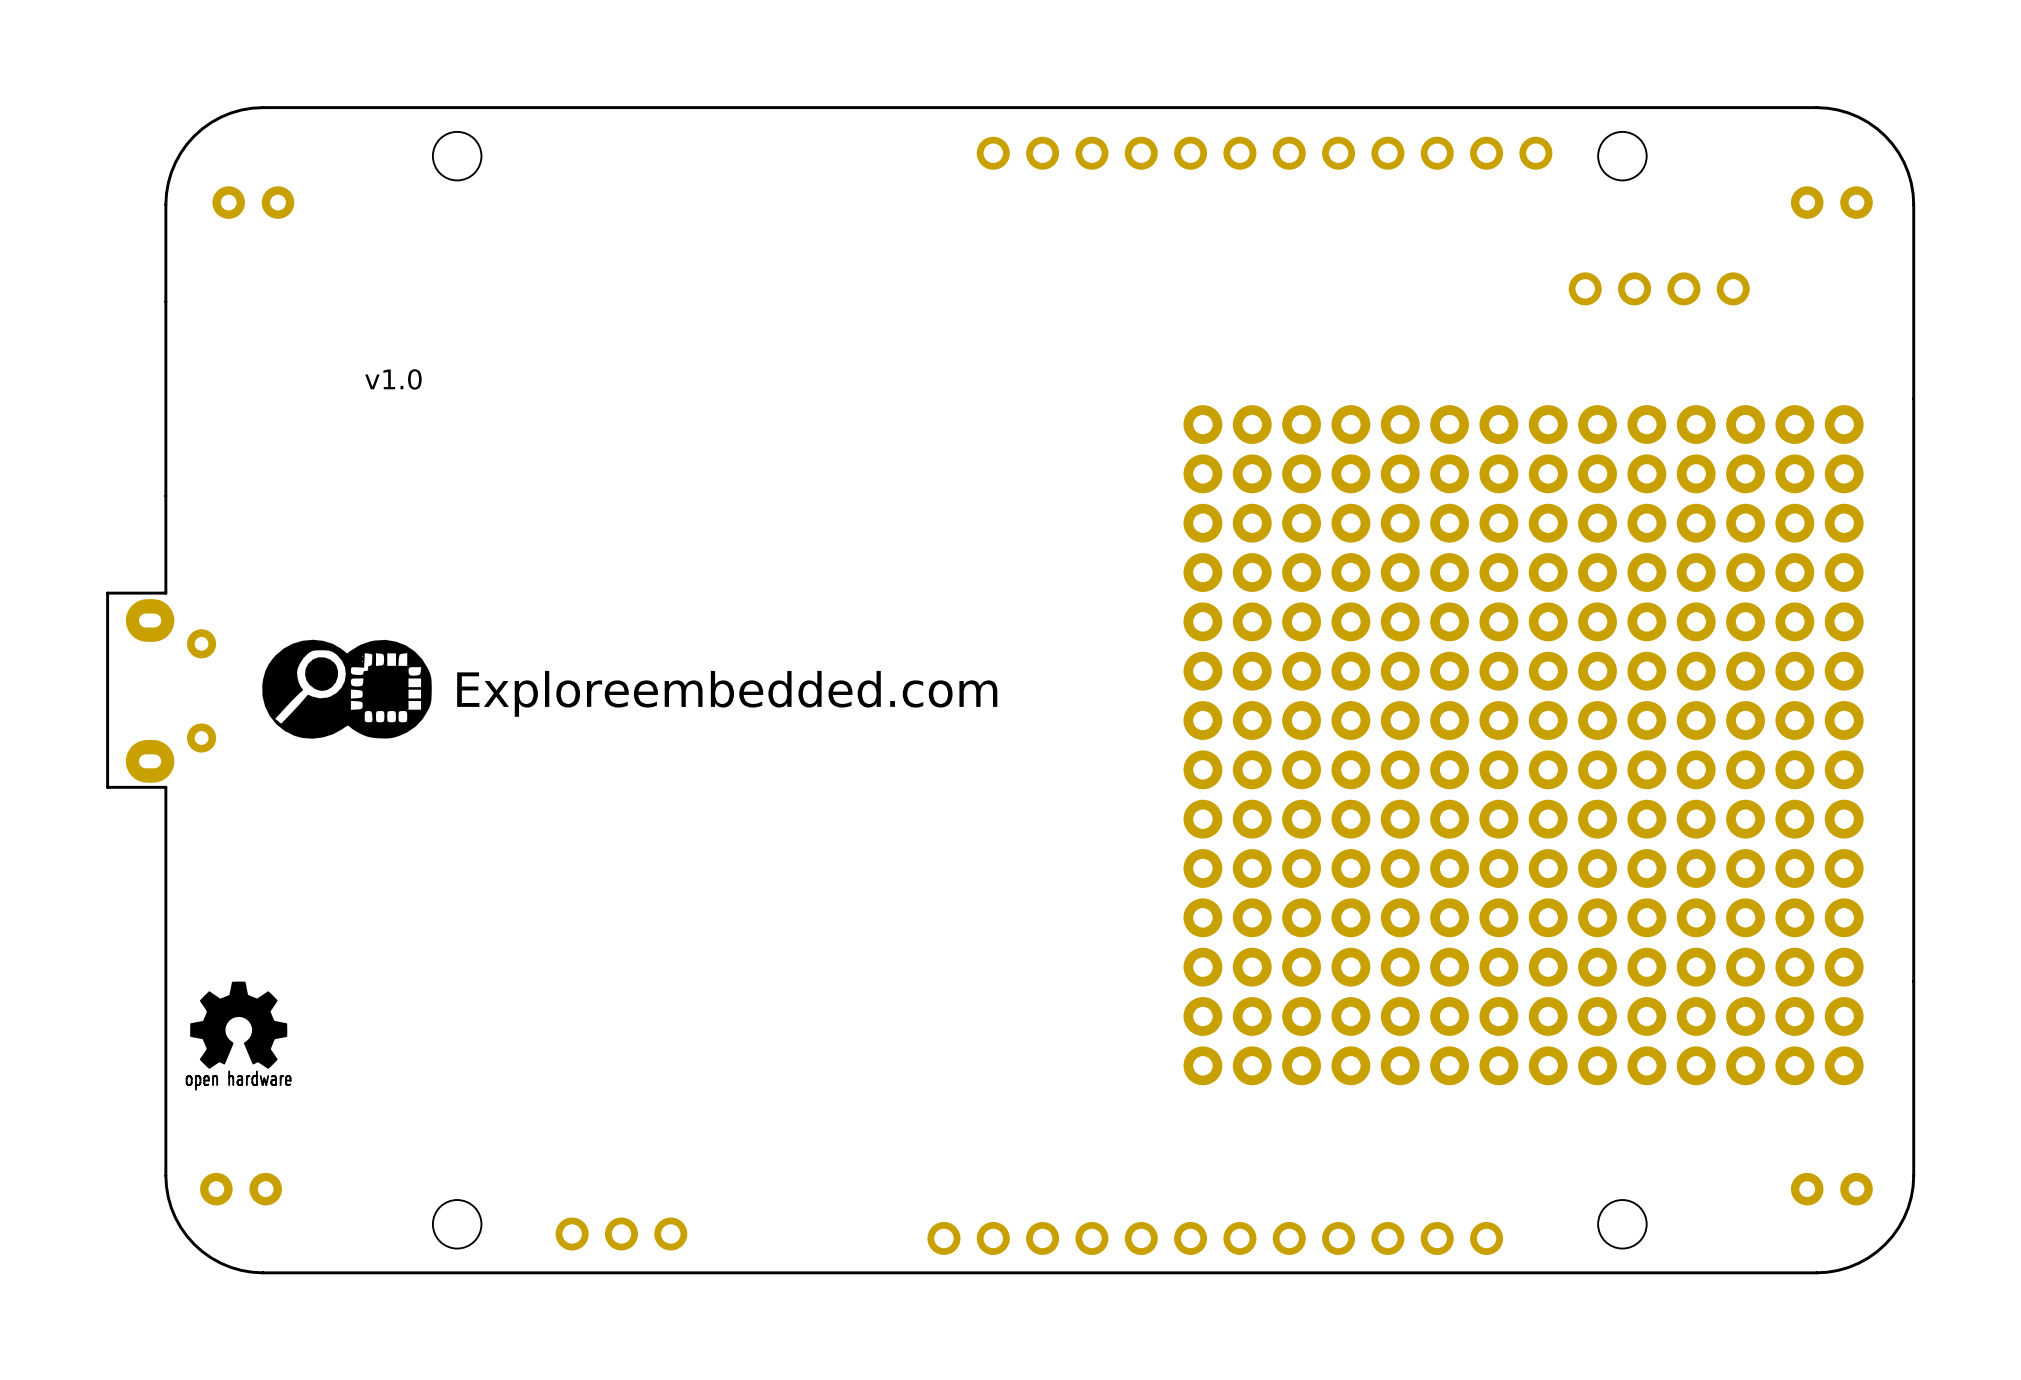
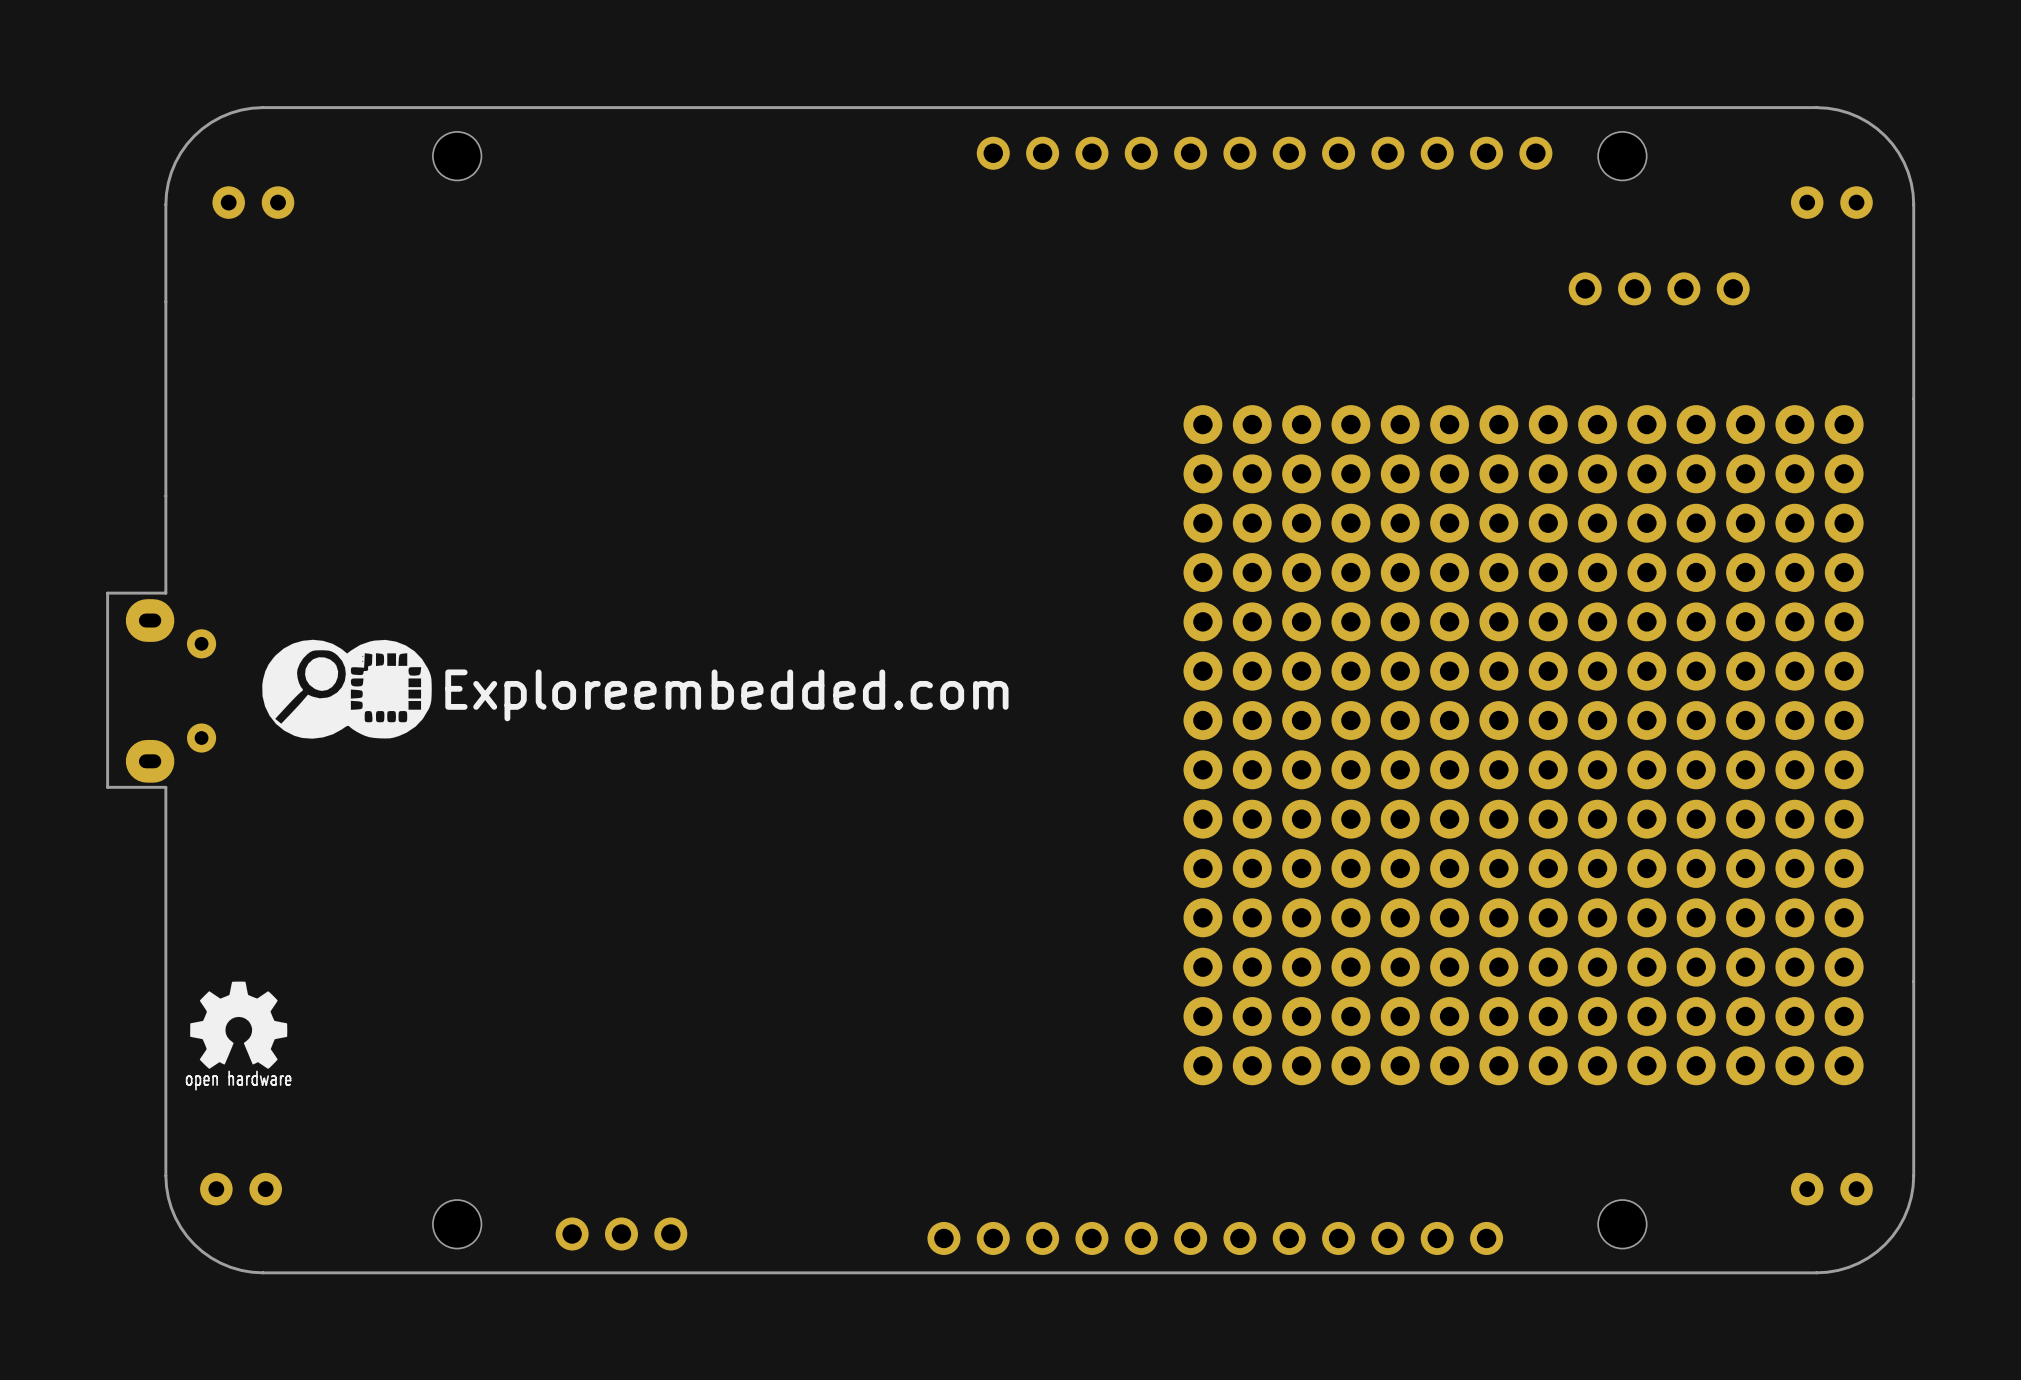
text: v1.0 (393, 379) -> none

